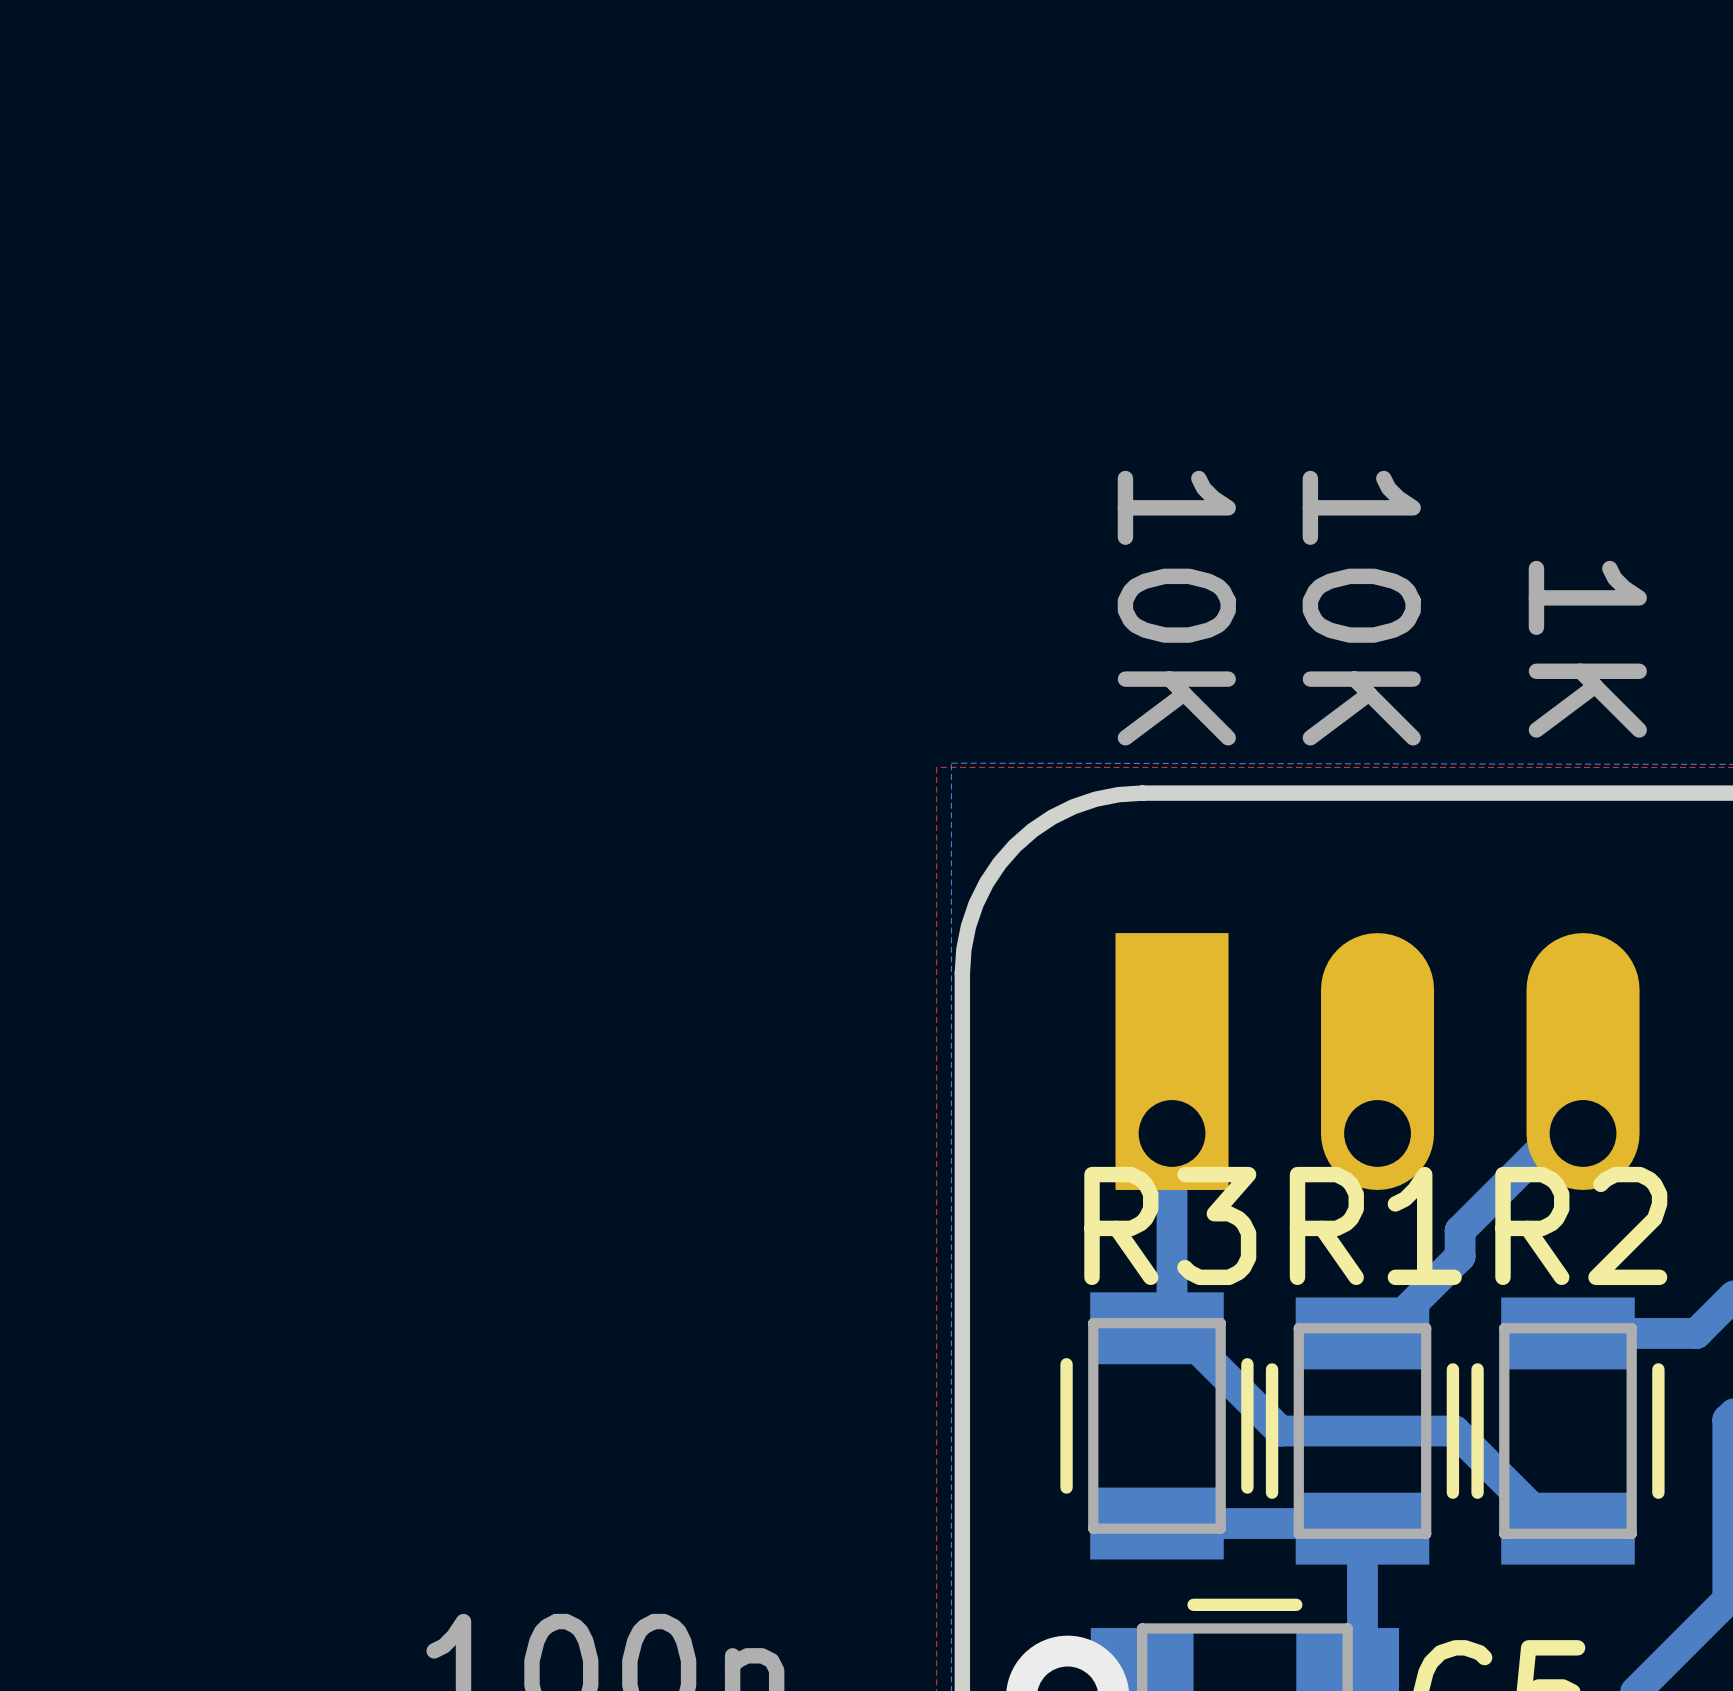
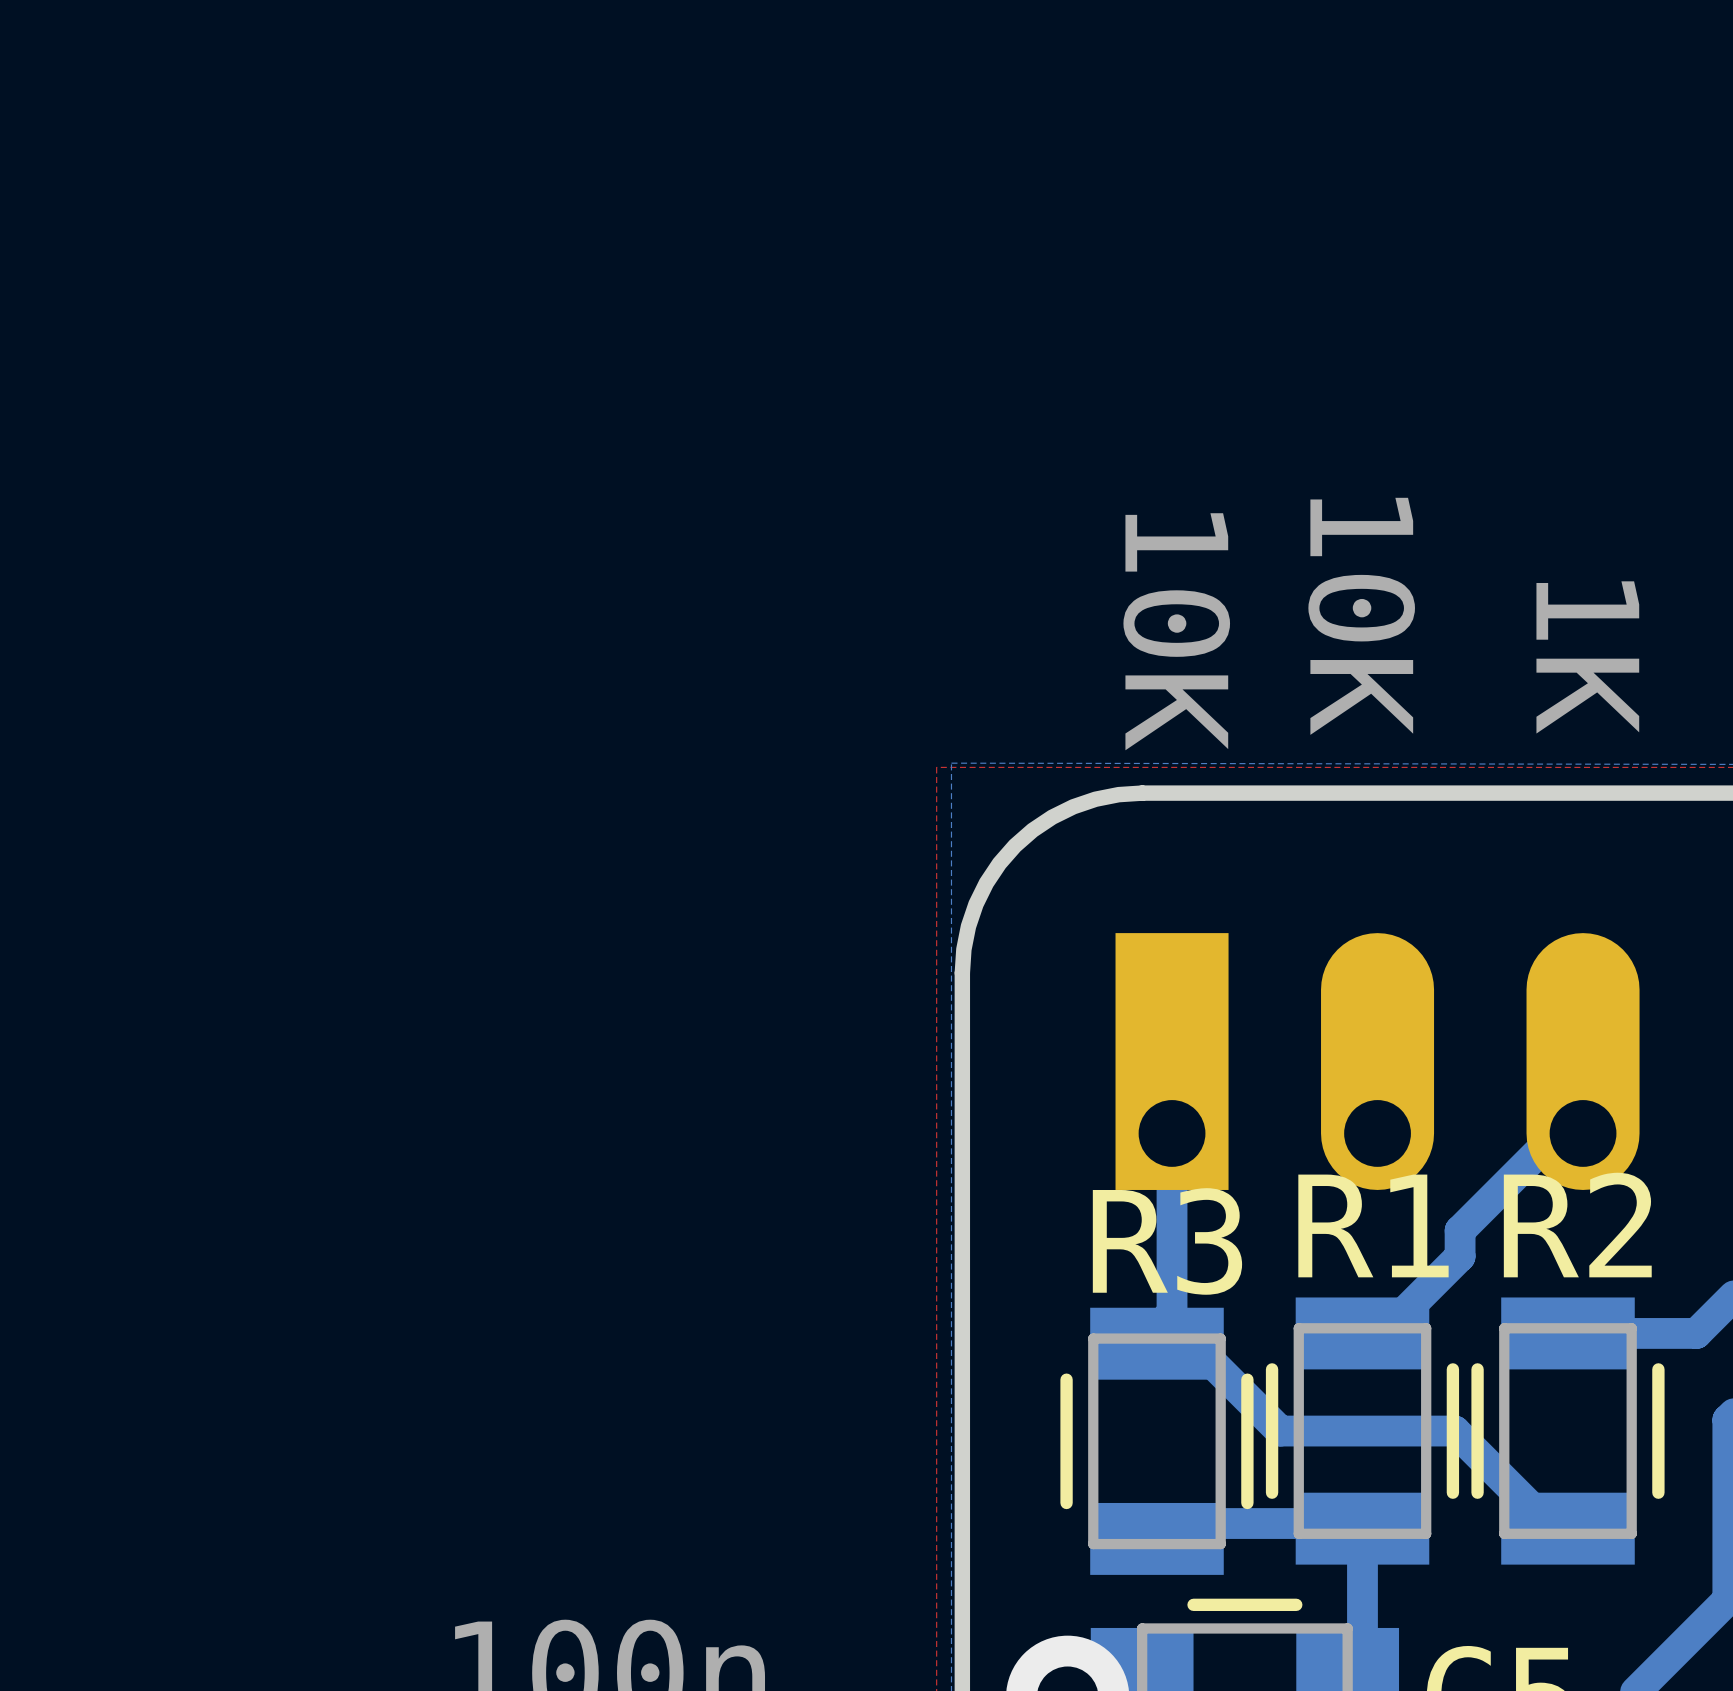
R3 position: (1156, 1425) -> (1156, 1441)

